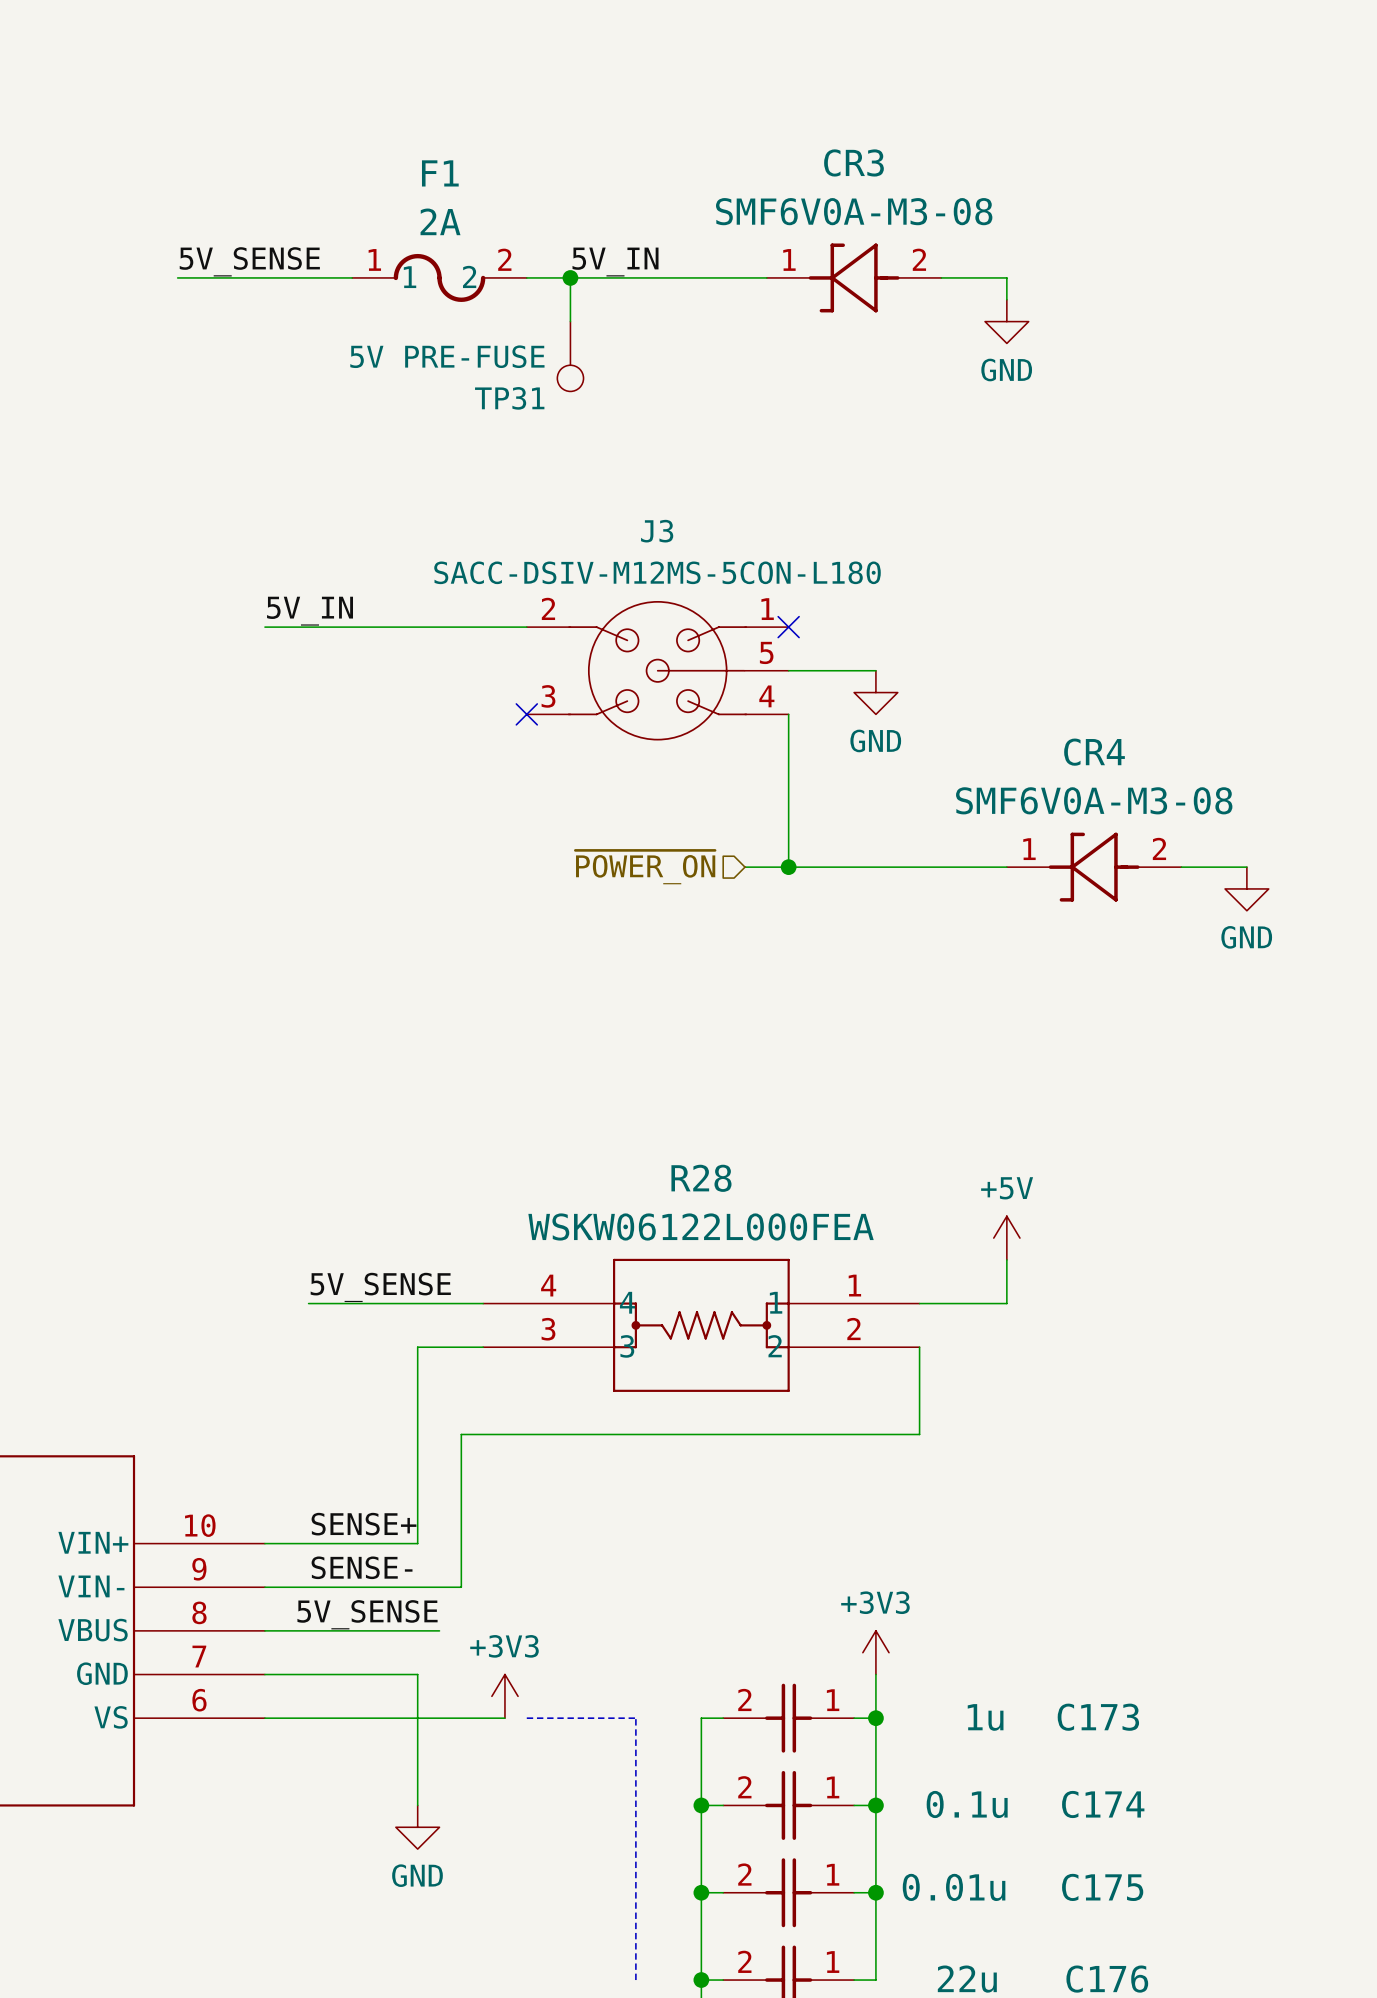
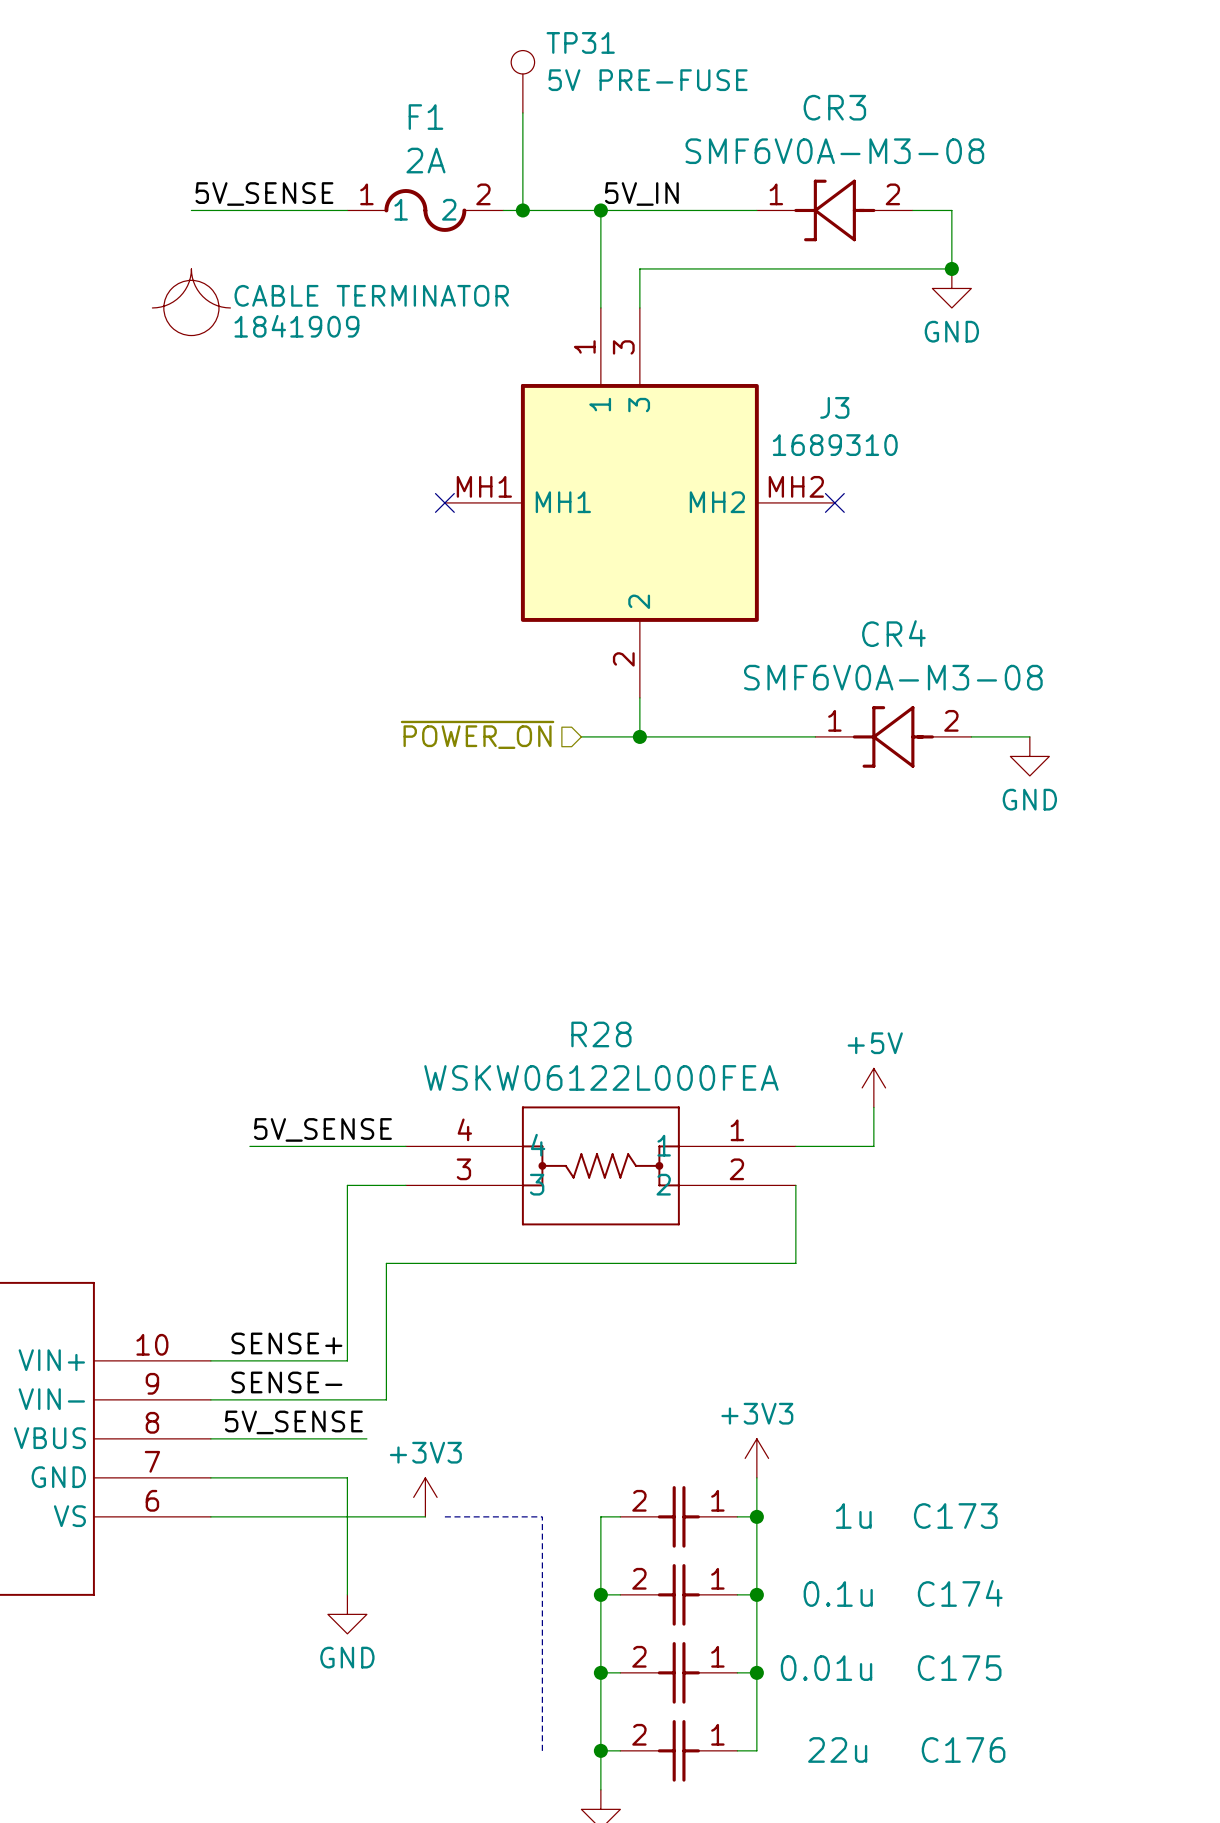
wire: none -> (522, 112) (522, 210)
wire: none -> (503, 210) (756, 210)
wire: none -> (600, 210) (600, 307)
junction: none -> (600, 210)
wire: none -> (912, 210) (951, 210) (951, 268) (639, 268) (639, 307)
label position: 5V_SENSE (249, 261) -> 5V_SENSE (264, 194)
label position: 5V_IN (615, 262) -> 5V_IN (641, 194)
wire: (177, 277) (352, 277) -> (191, 210) (347, 210)
F1 position: (439, 277) -> (425, 210)
wire: (526, 277) (766, 277) -> none
wire: (570, 277) (570, 321) -> none
junction position: (570, 277) -> (522, 210)
CR3 position: (854, 277) -> (834, 210)
wire: (941, 277) (1006, 277) (1006, 299) -> none
power symbol position: GND (1006, 321) -> GND (951, 288)
junction: none -> (951, 268)
TP31 position: (570, 356) -> (522, 81)
part: none -> 1841909 (191, 302)
TP31 rotation: 0° (570, 378) -> 180° (522, 62)
J3 name position: J3 (657, 531) -> J3 (834, 407)
J3 value: SACC-DSIV-M12MS-5CON-L180 (657, 572) -> 1689310 (835, 445)
no-connect mark: none -> (444, 502)
no-connect mark: none -> (834, 502)
J3 symbol: [526, 600, 789, 741] -> [444, 307, 835, 698]
label: 5V_IN (310, 611) -> none
wire: (264, 627) (526, 627) -> none
no-connect mark: (788, 627) -> none
power symbol: GND (875, 692) -> none
no-connect mark: (526, 714) -> none
wire: (788, 714) (788, 867) -> none
wire: none -> (639, 697) (639, 736)
hierarchical label position: ~{POWER_ON} (645, 867) -> ~{POWER_ON} (477, 734)
wire: (745, 867) (1006, 867) -> (581, 736) (815, 736)
junction position: (788, 867) -> (639, 736)
CR4 position: (1094, 867) -> (893, 736)
wire: (1181, 867) (1246, 867) -> (971, 736) (1029, 736)
power symbol position: GND (1246, 888) -> GND (1029, 756)

